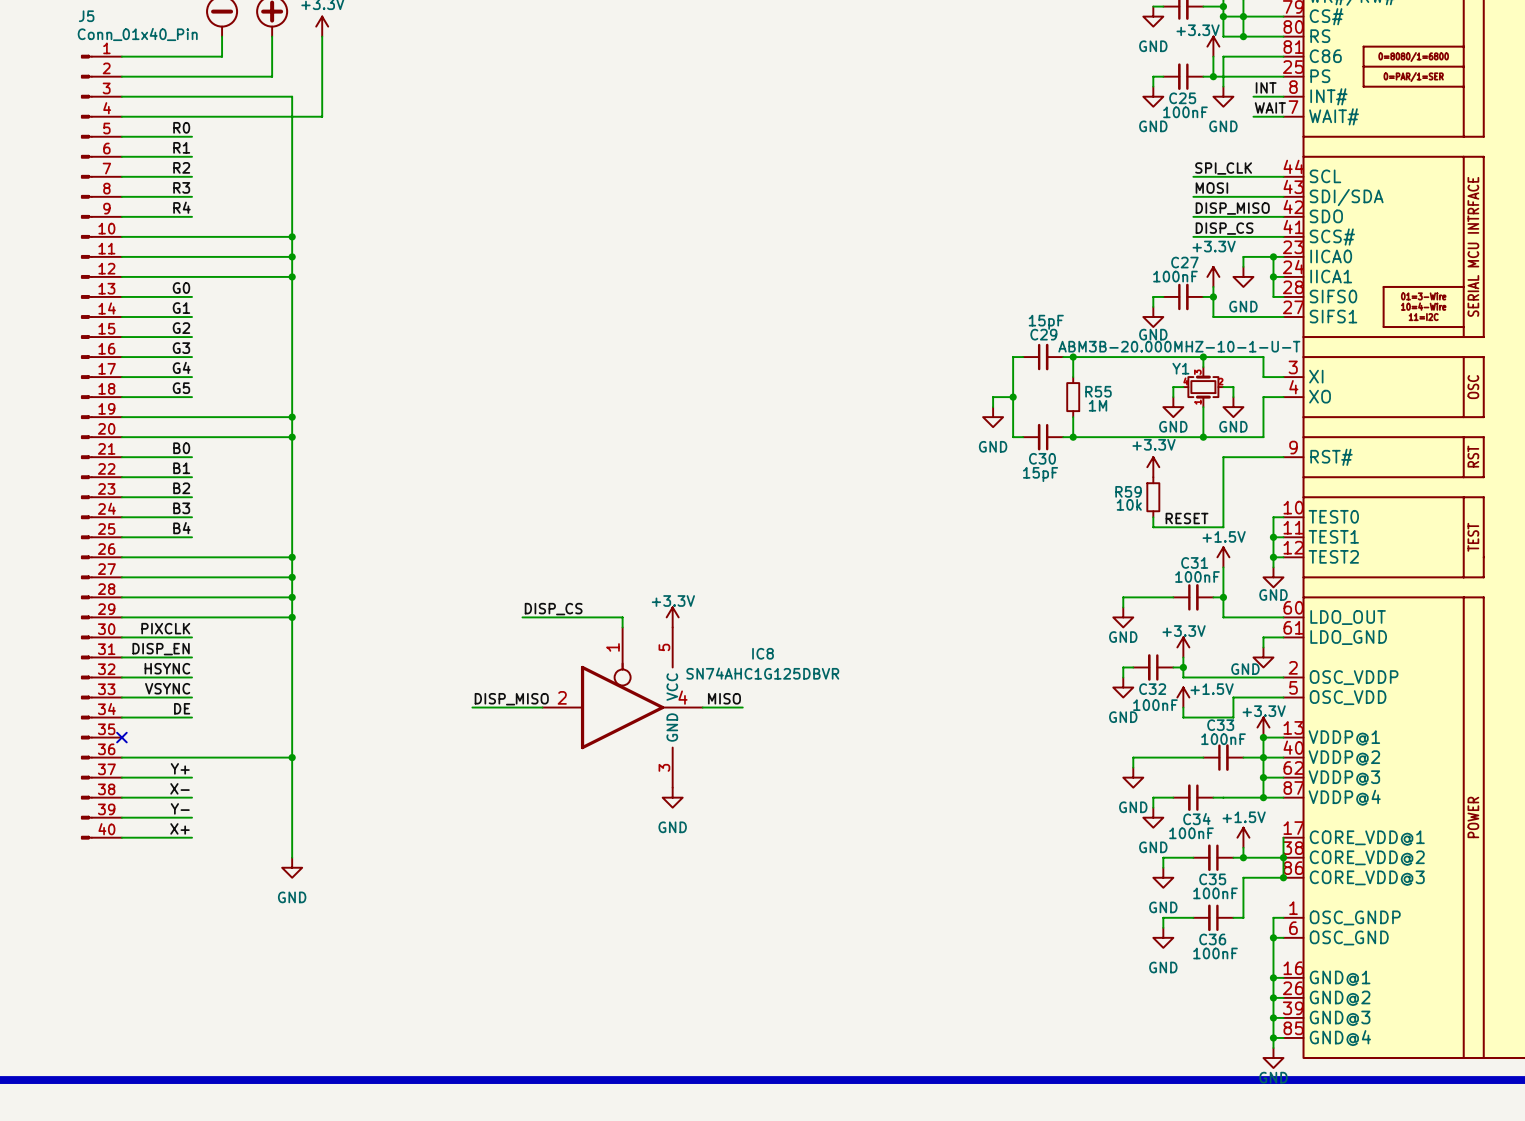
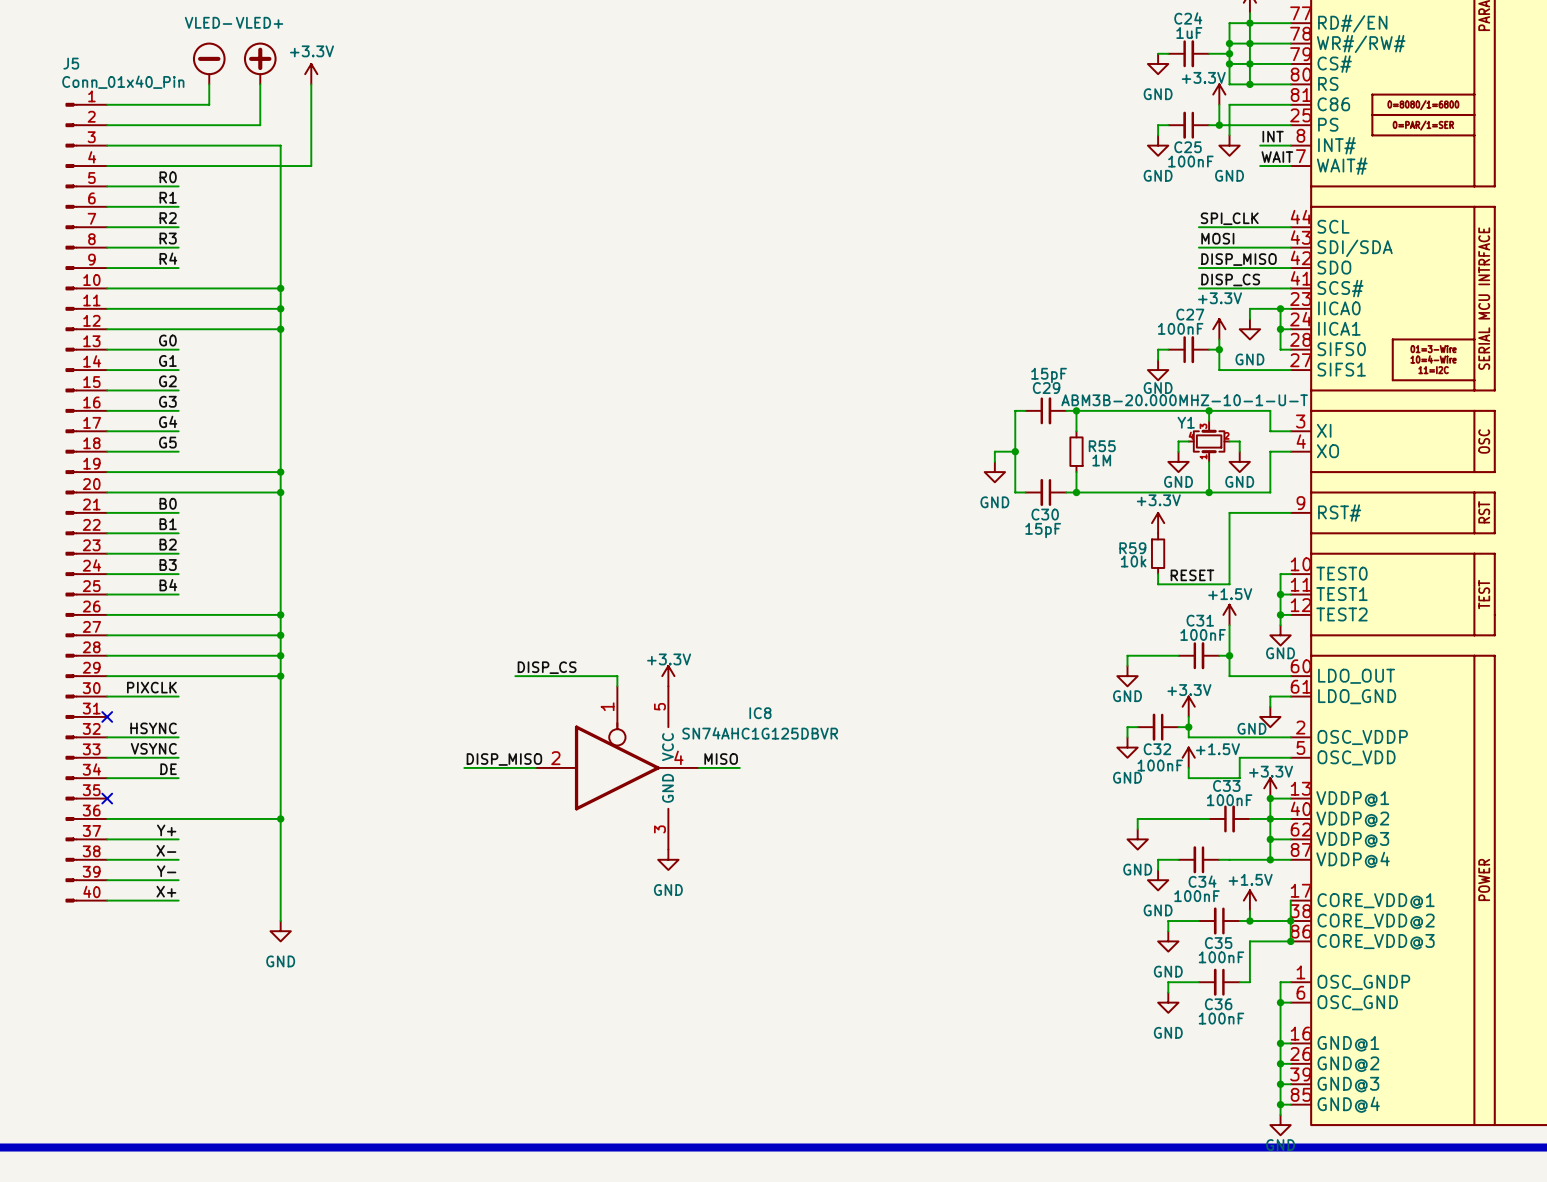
label: DISP_EN (161, 649) -> none
wire: (121, 657) (192, 657) -> none
no-connect mark: none -> (107, 716)

